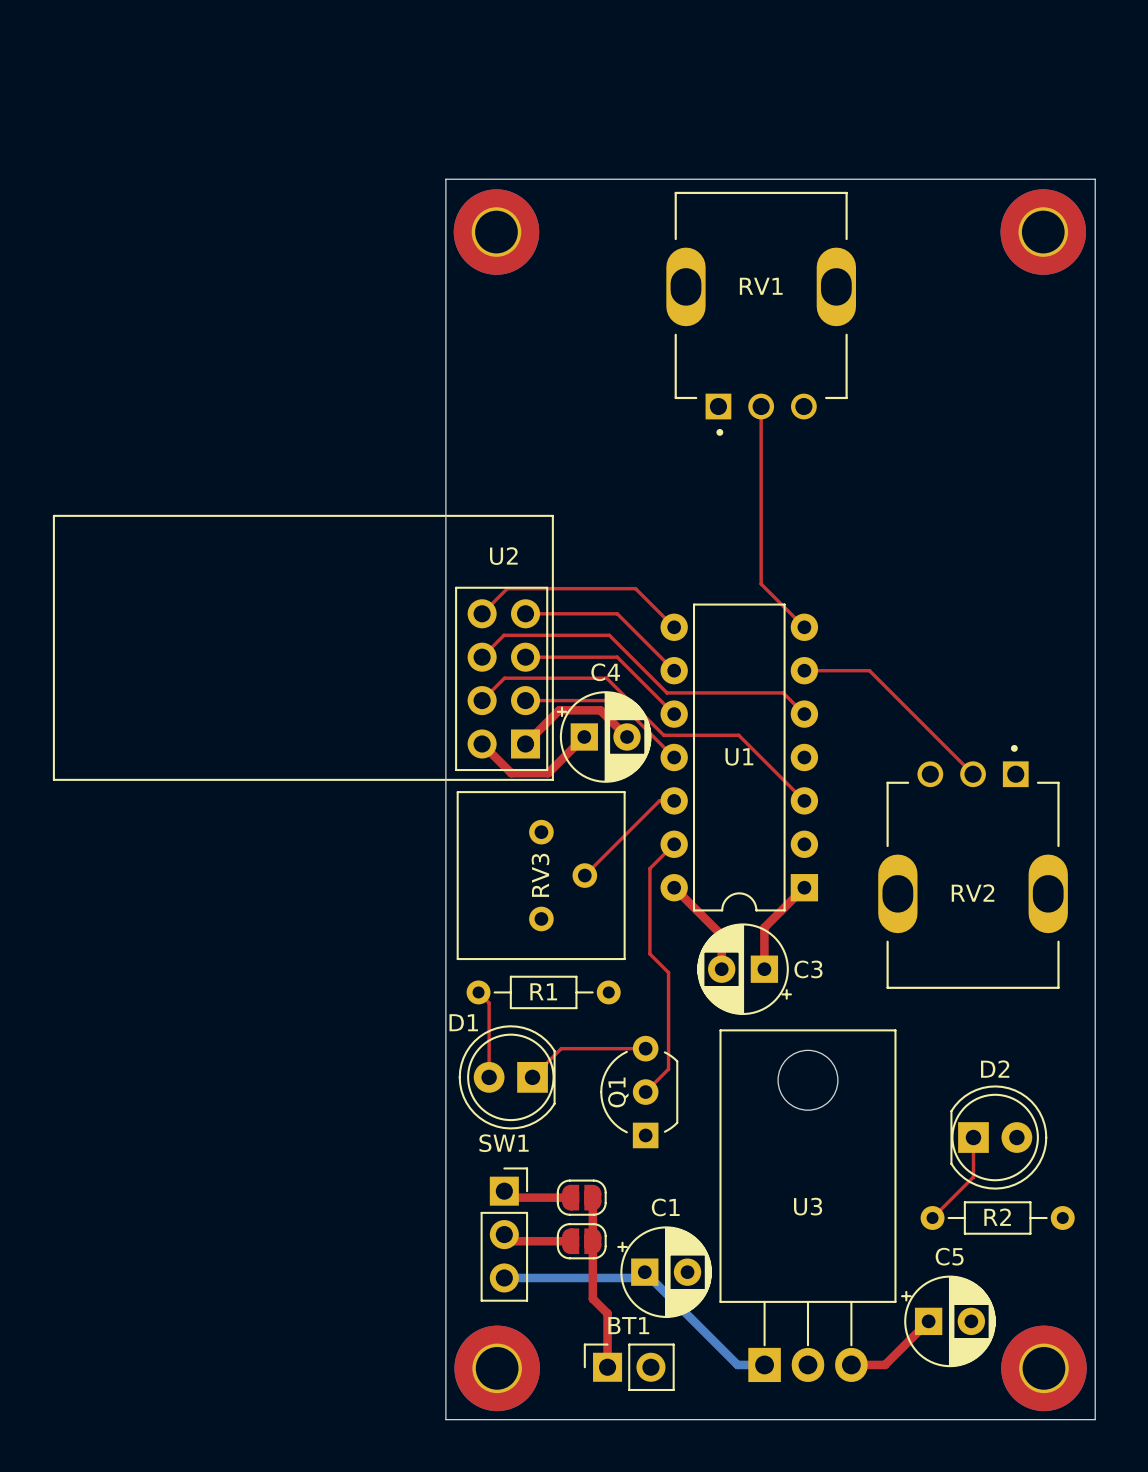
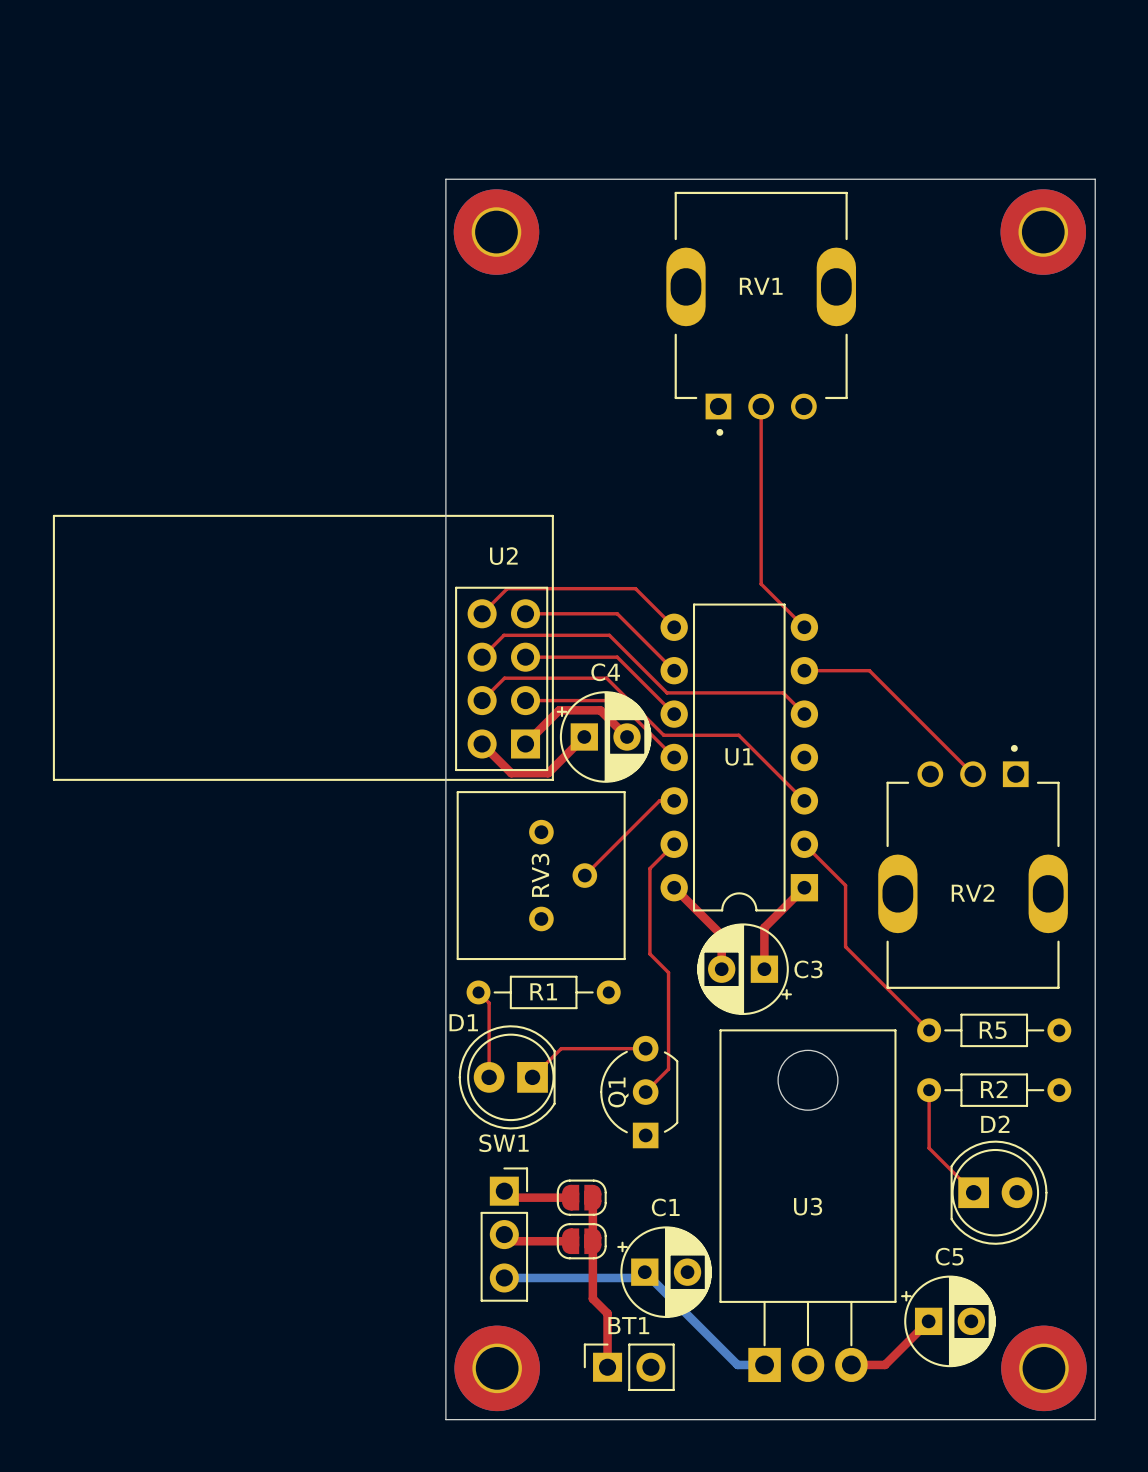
top track: none -> (804, 844) (845, 885) (845, 946) (929, 1030)
R5: none -> (994, 1030)
top track: none -> (929, 1090) (929, 1148) (973, 1192)
top track: (973, 1137) (973, 1177) (932, 1218) -> none
D2 position: (998, 1137) -> (999, 1192)
R2 position: (997, 1218) -> (994, 1090)

